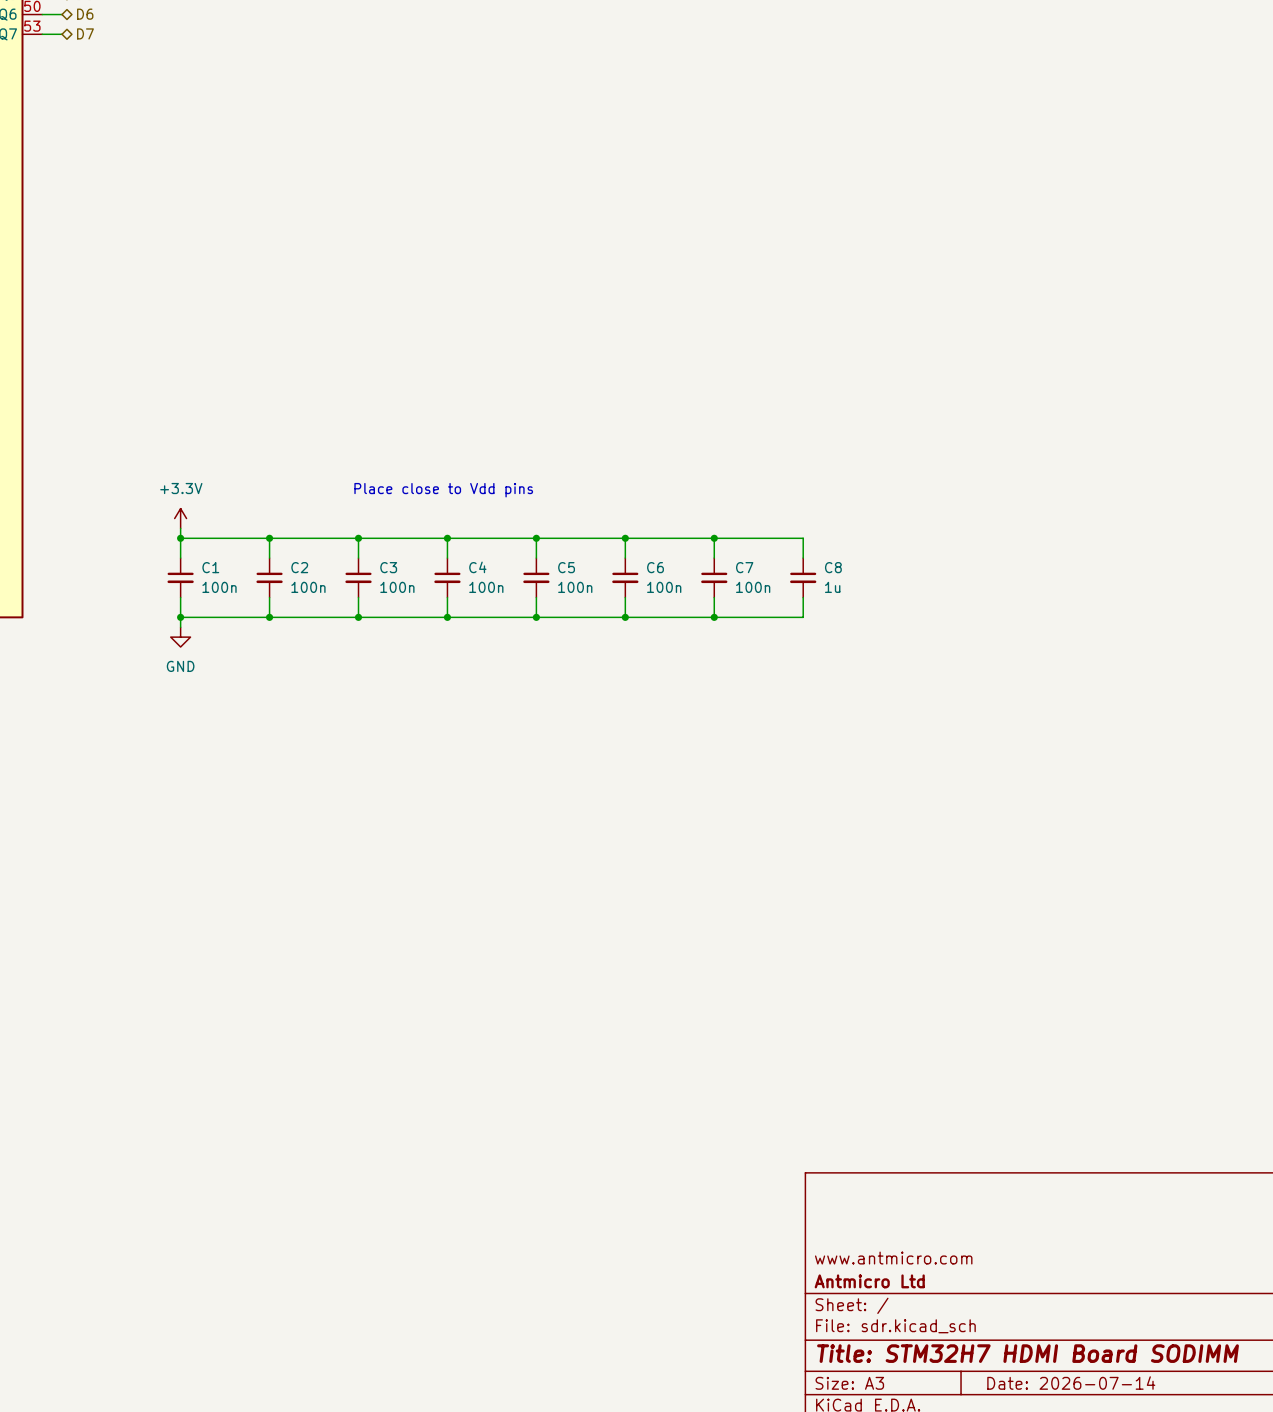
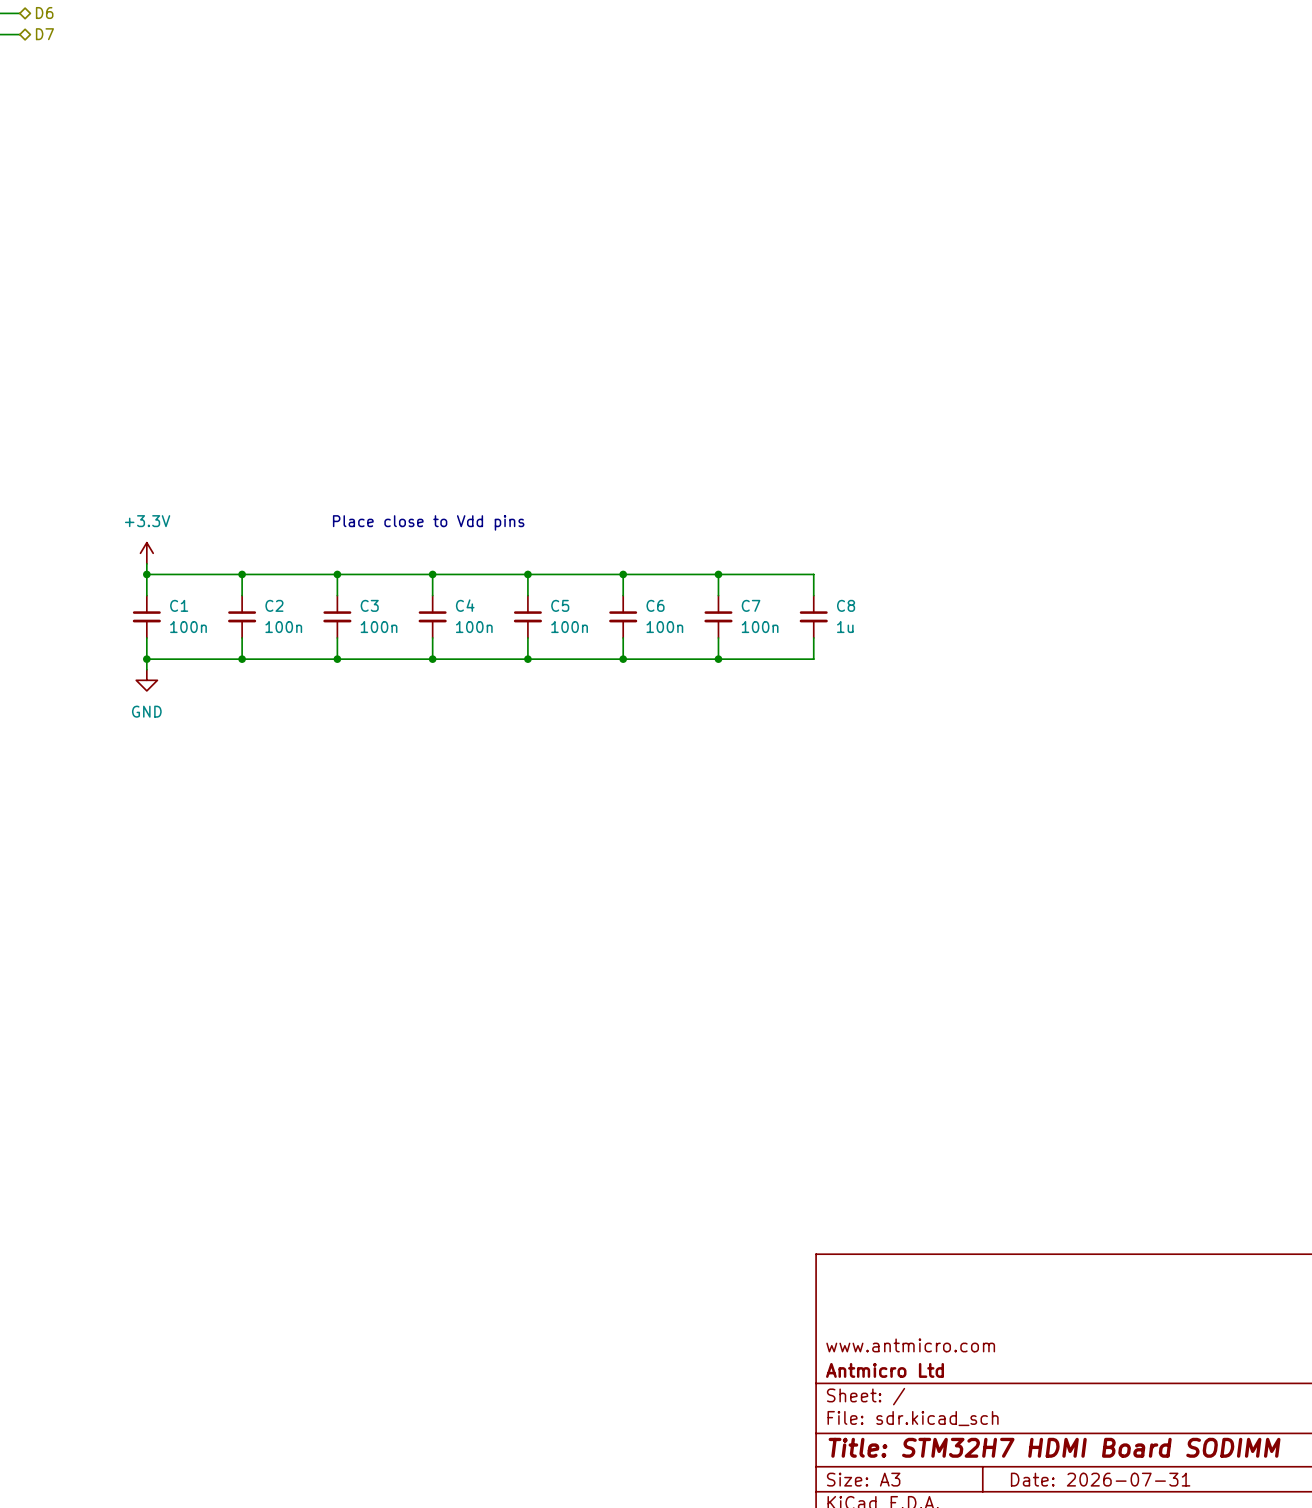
title block: Date: 2026-07-14 (1071, 1383) -> Date: 2026-07-31 (1100, 1479)

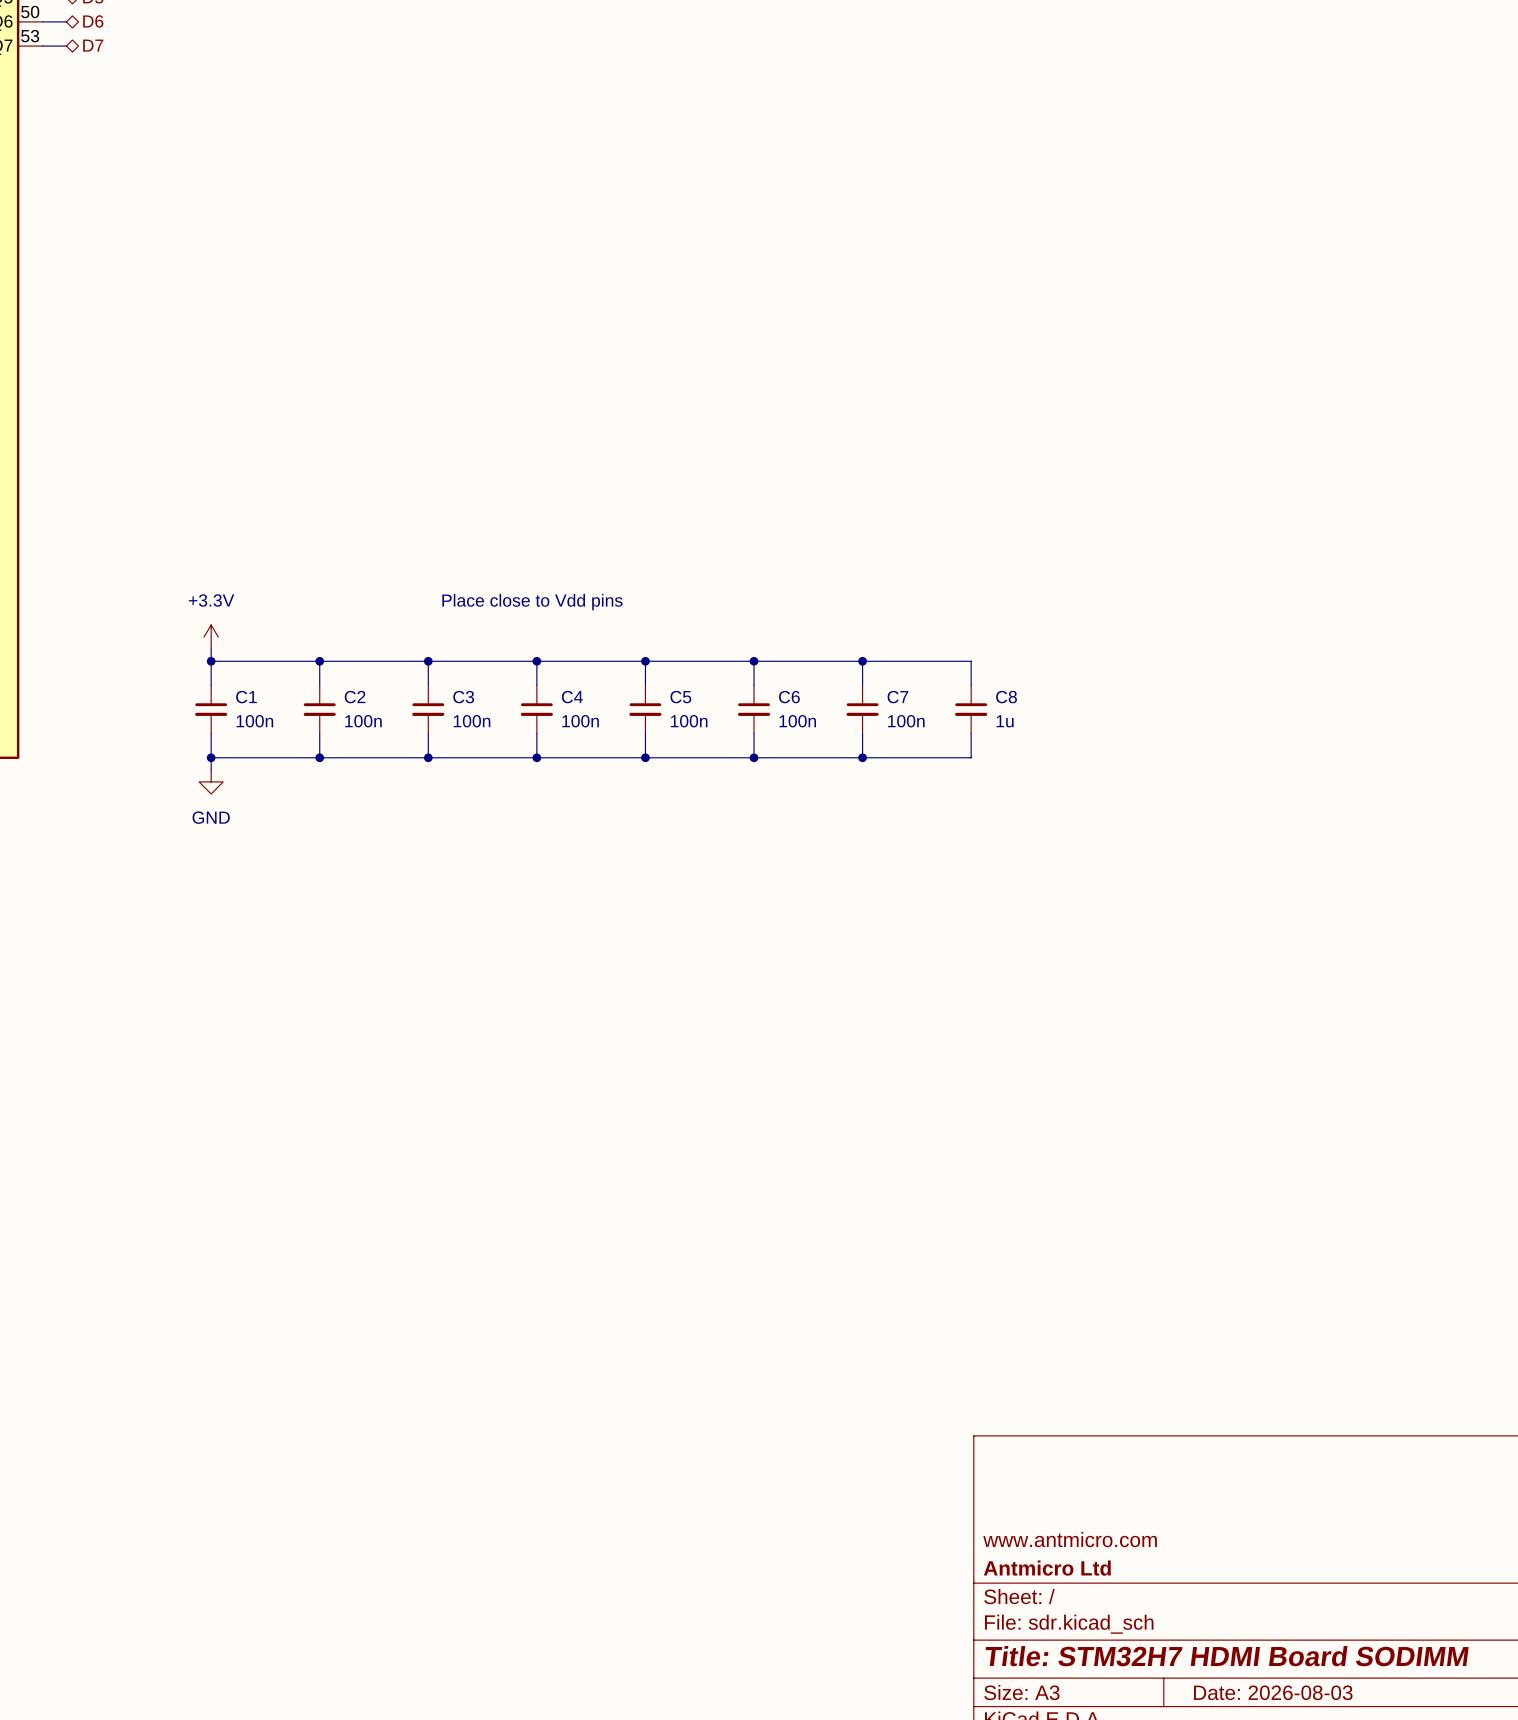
title block: Date: 2026-07-31 (1100, 1479) -> Date: 2026-08-03 (1273, 1692)

